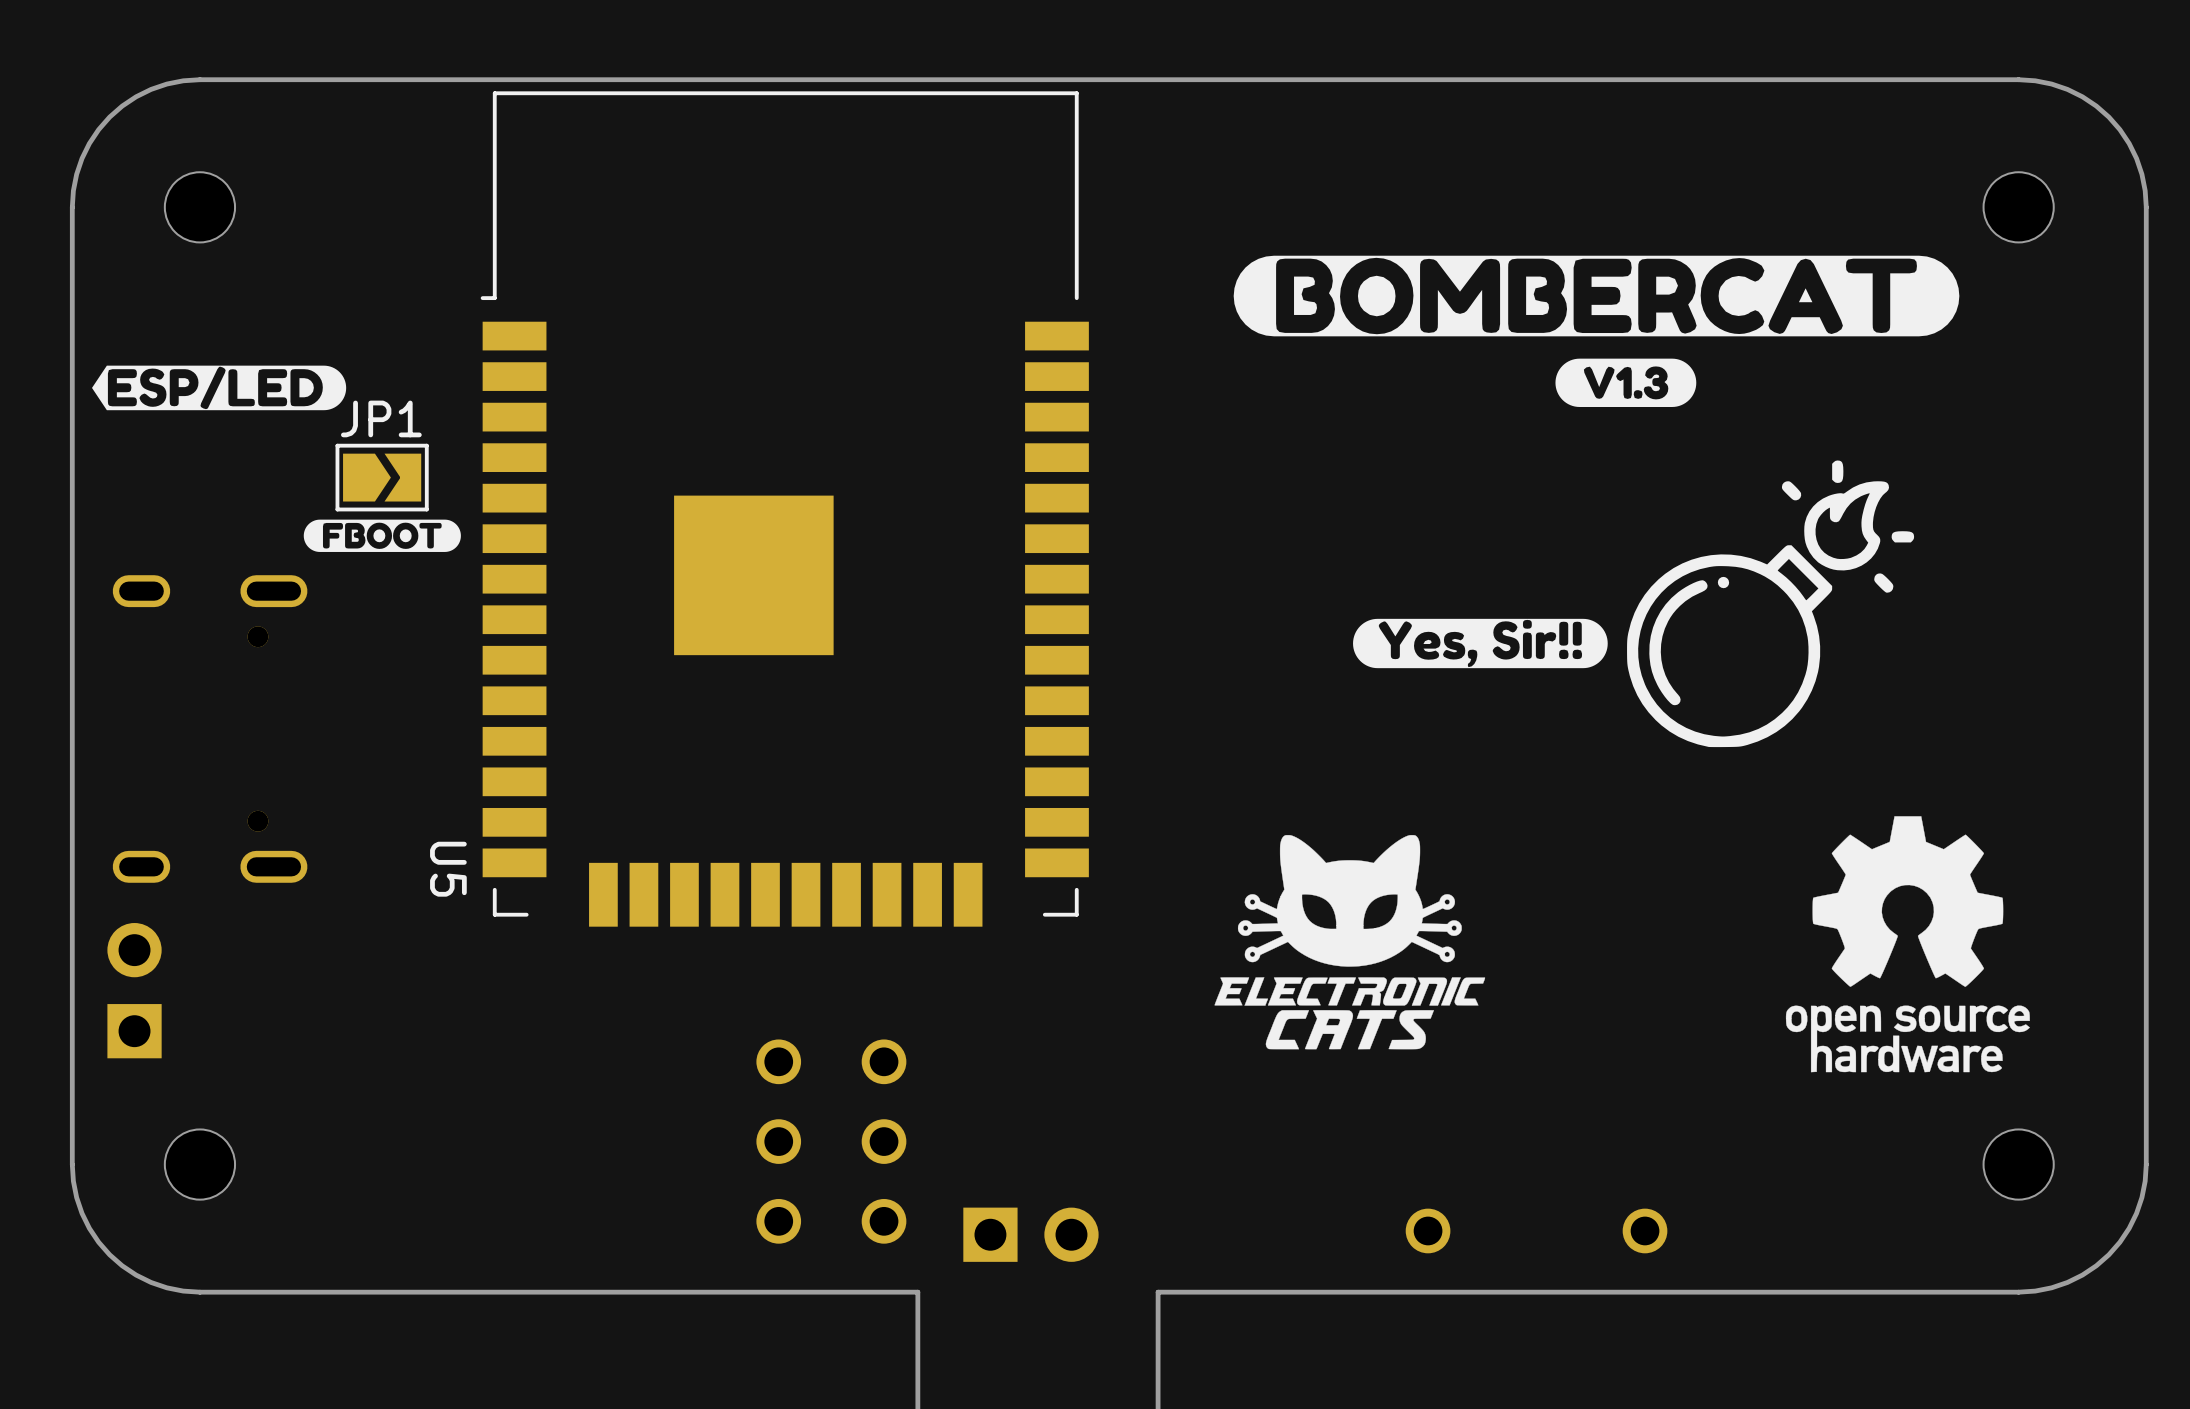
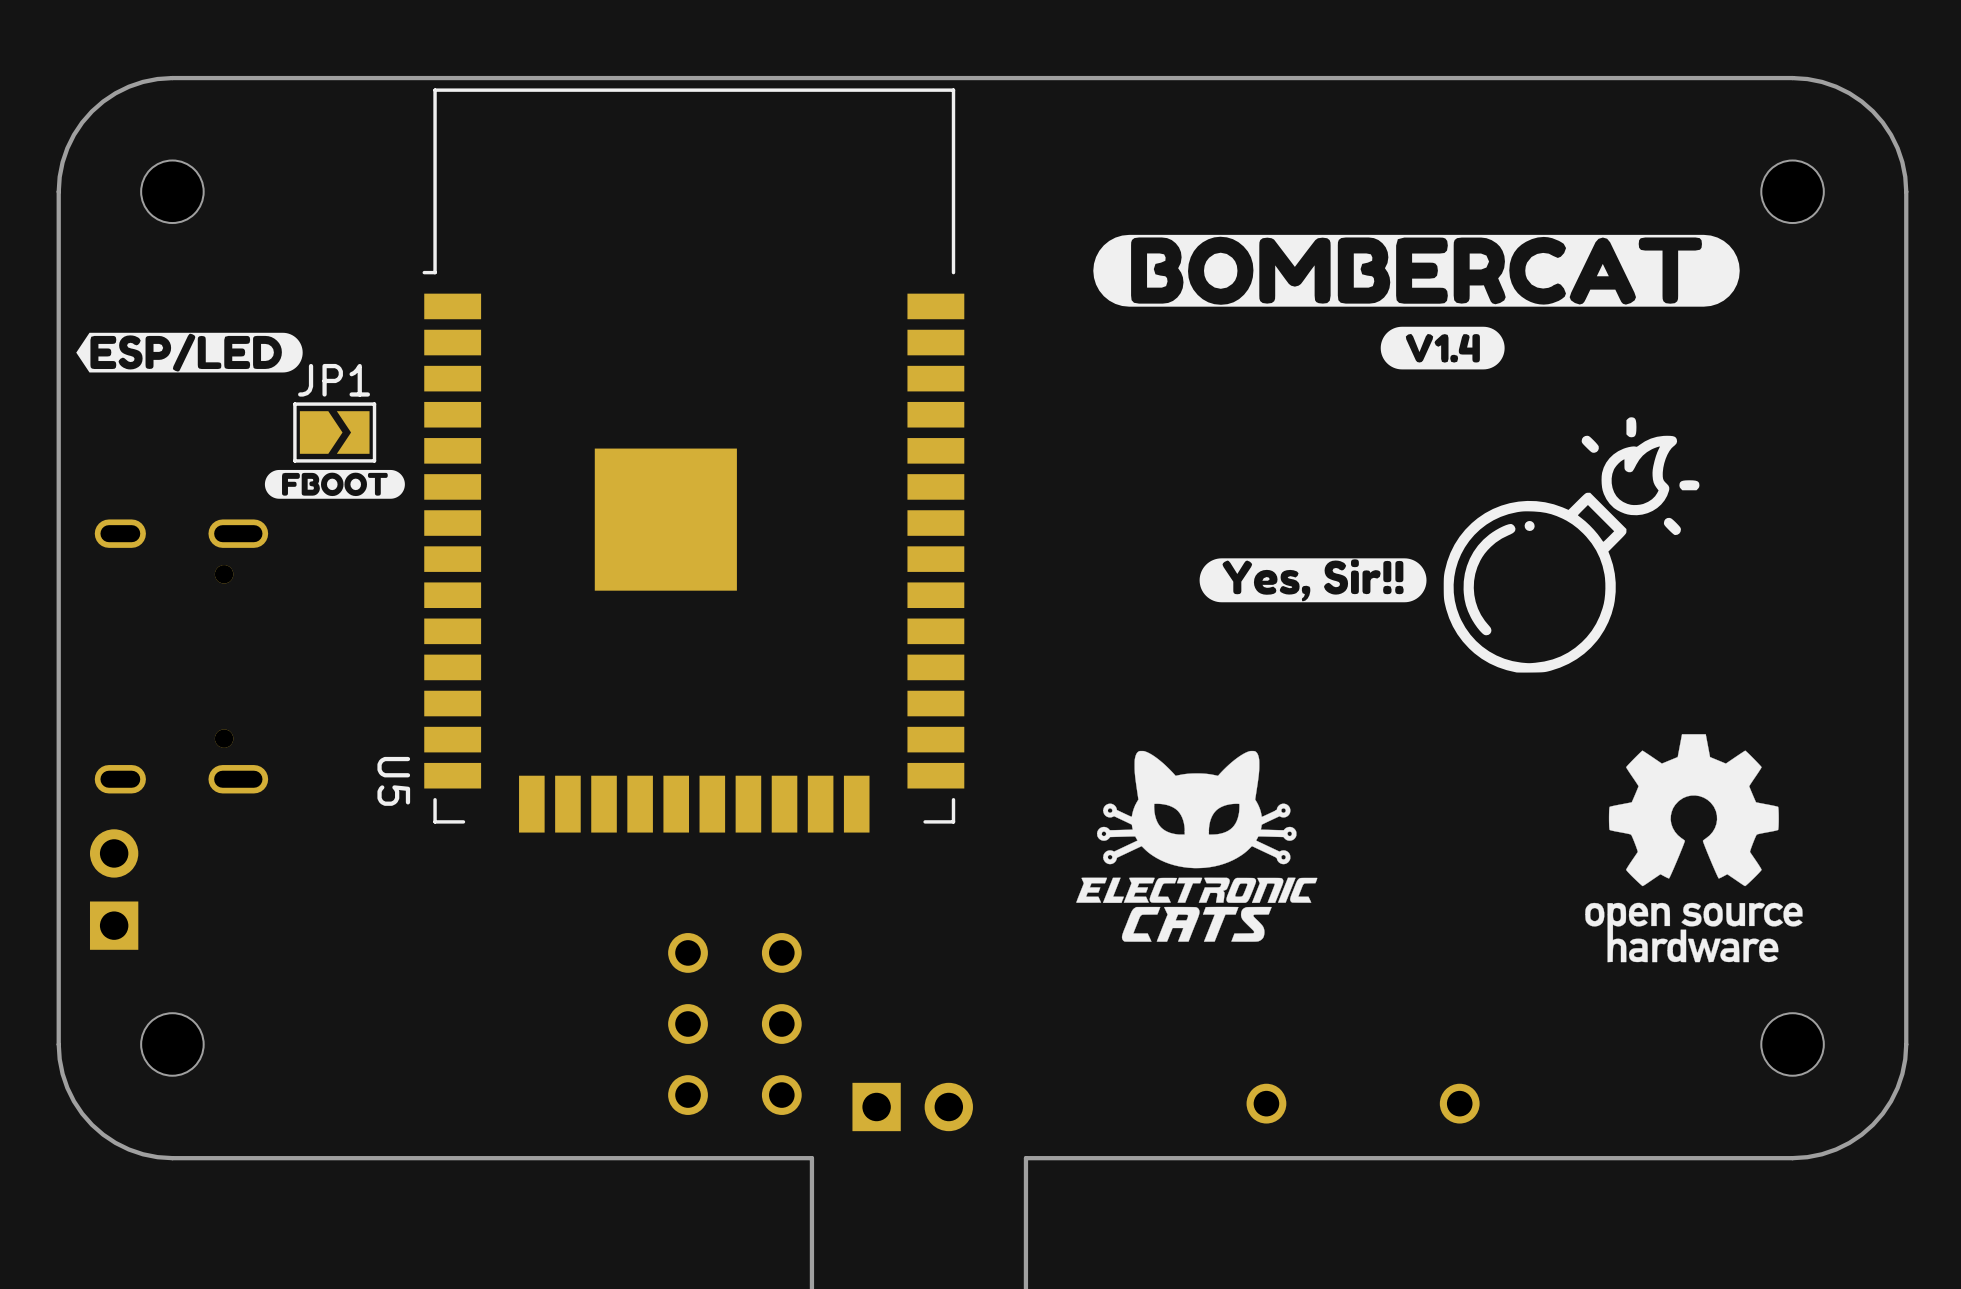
drawing shape: [1555, 358, 1697, 407] -> [1380, 326, 1505, 370]

